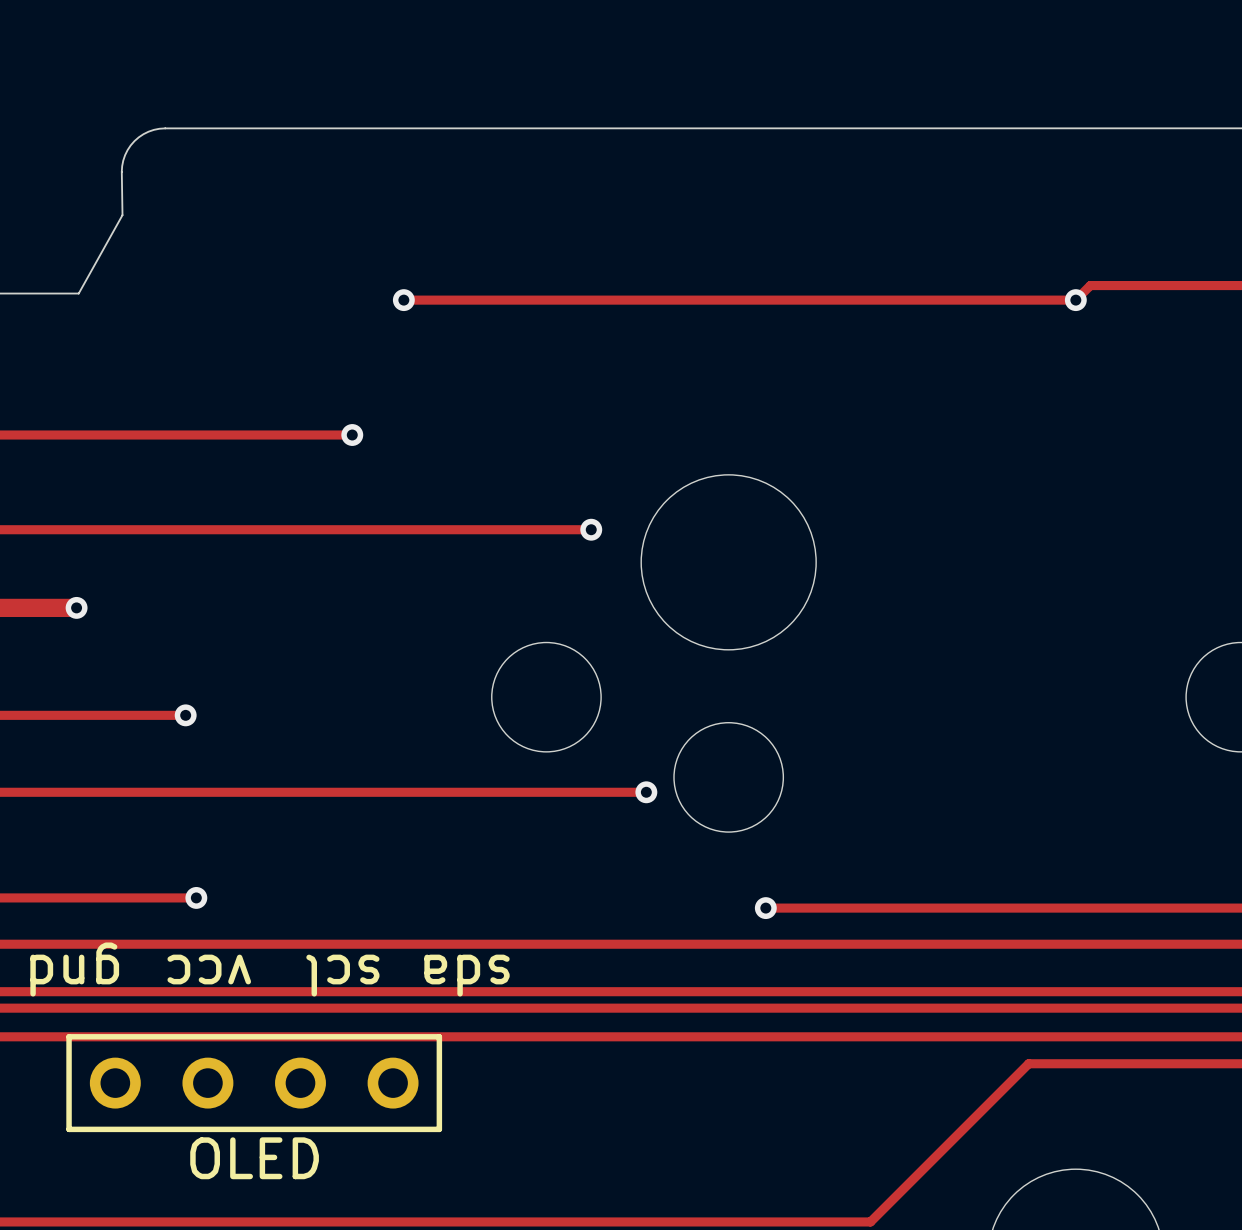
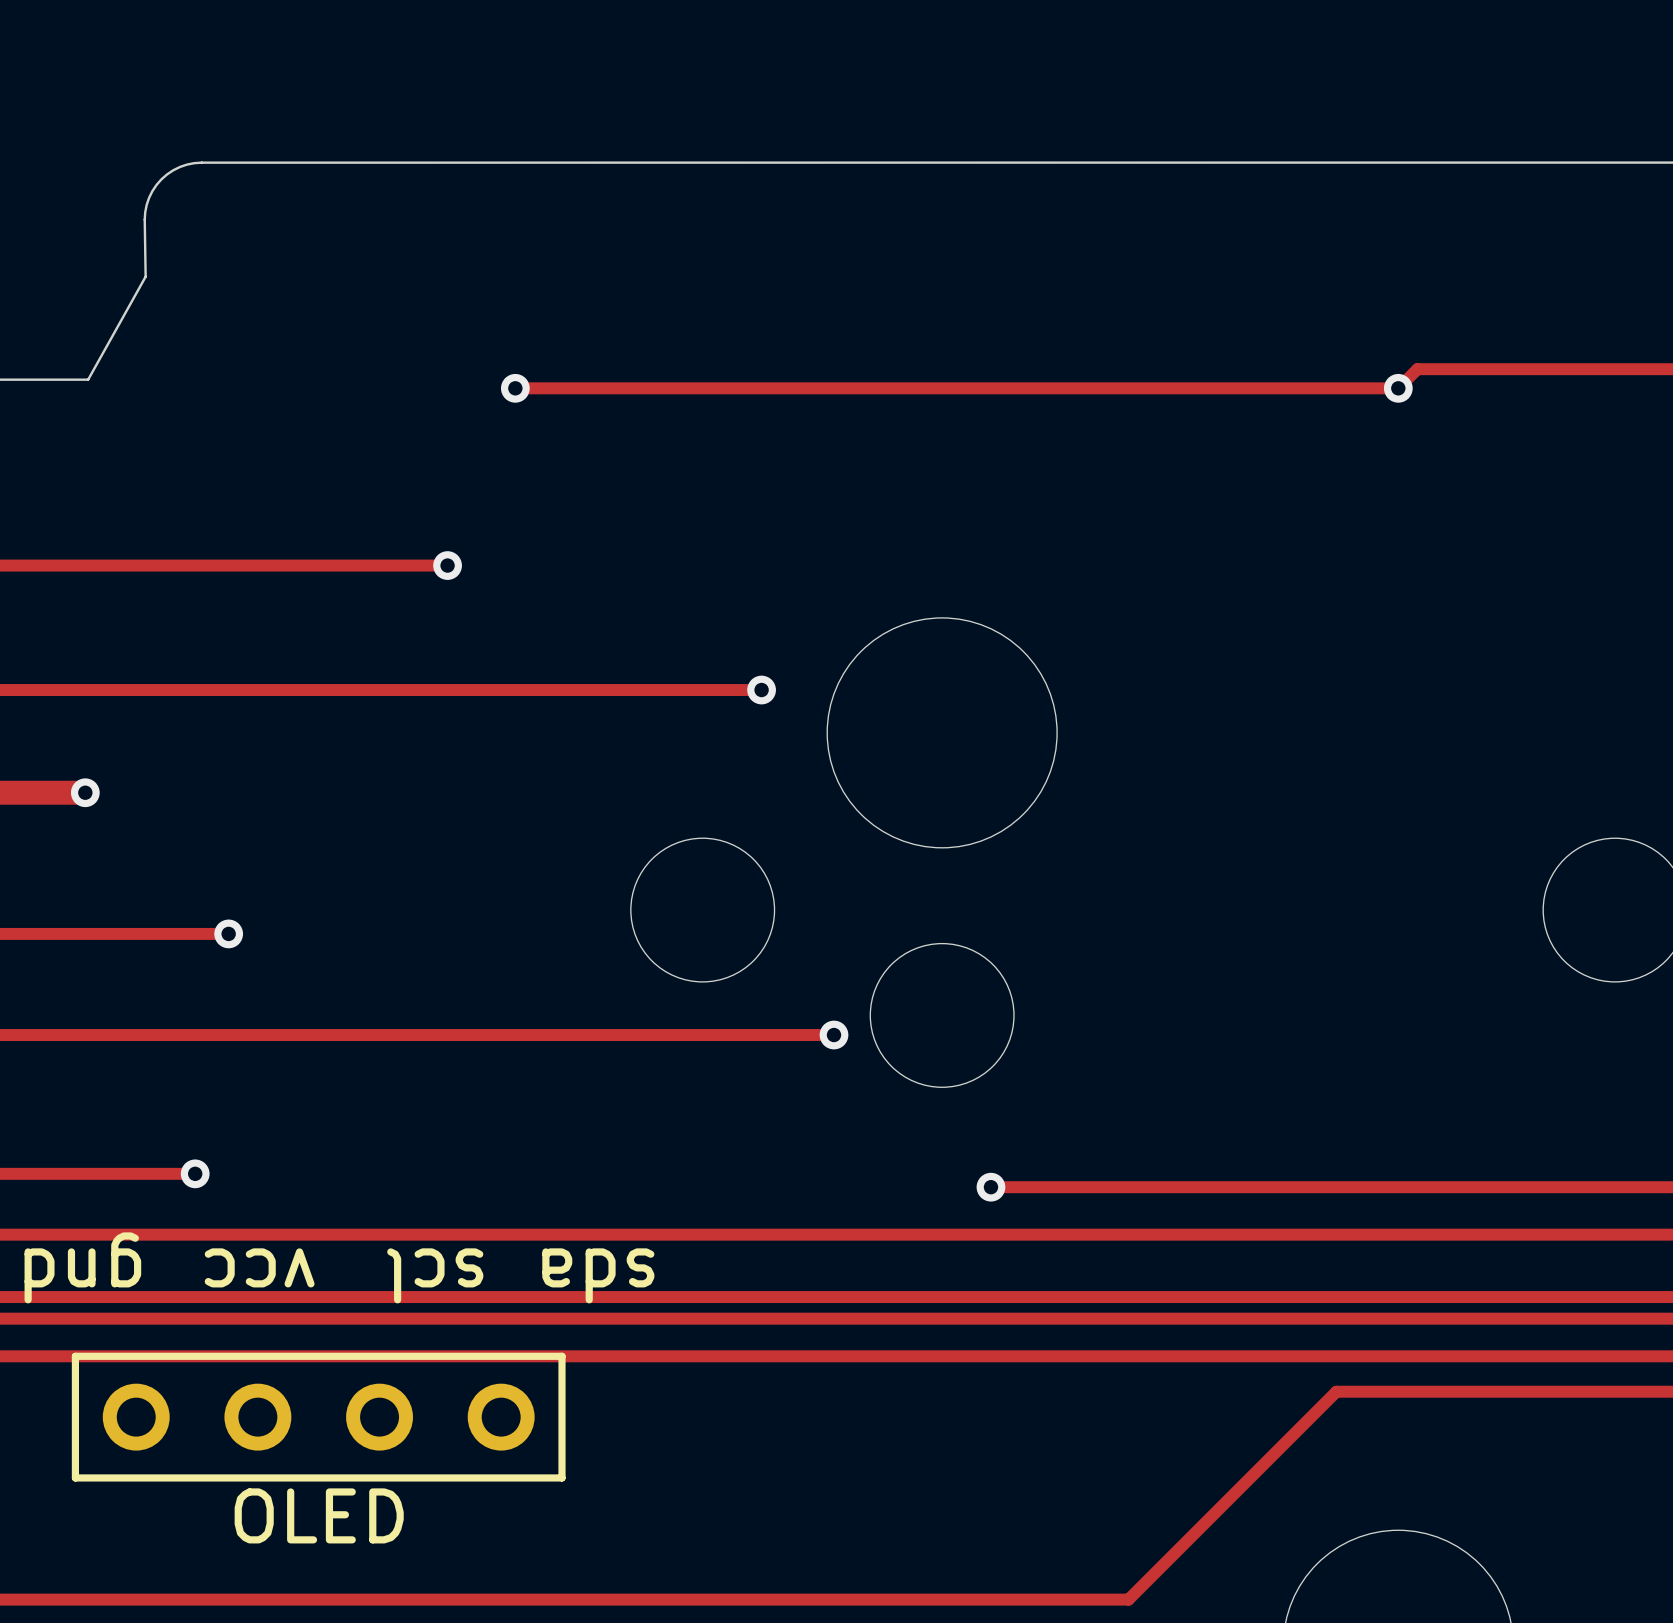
track: (160, 897) (196, 897) -> none
via position: (196, 897) -> (195, 1173)

